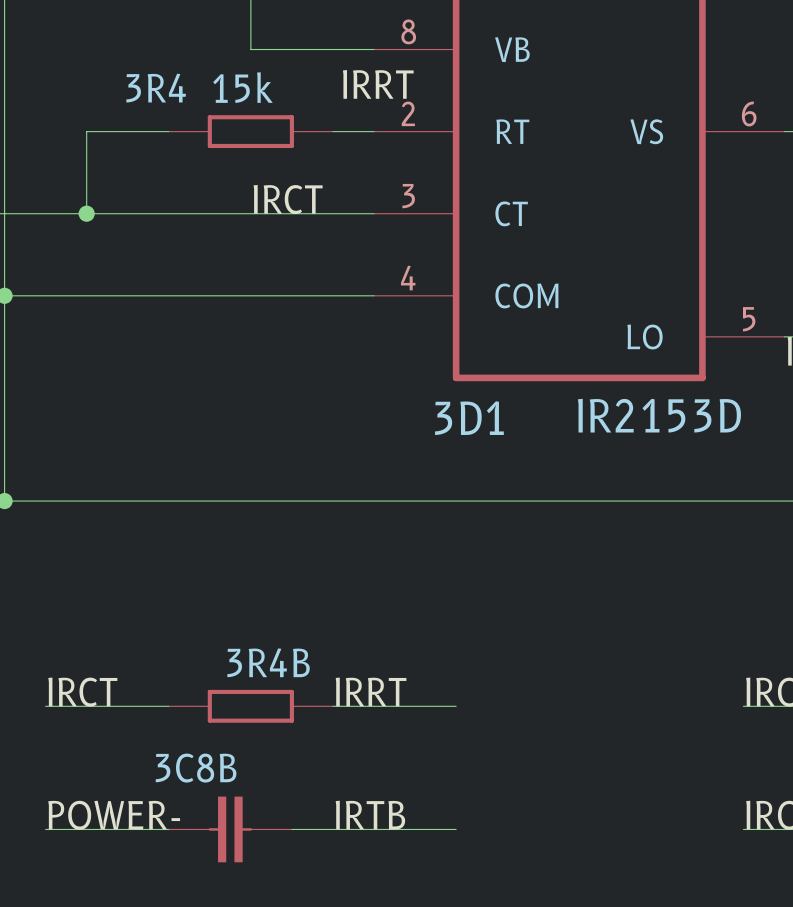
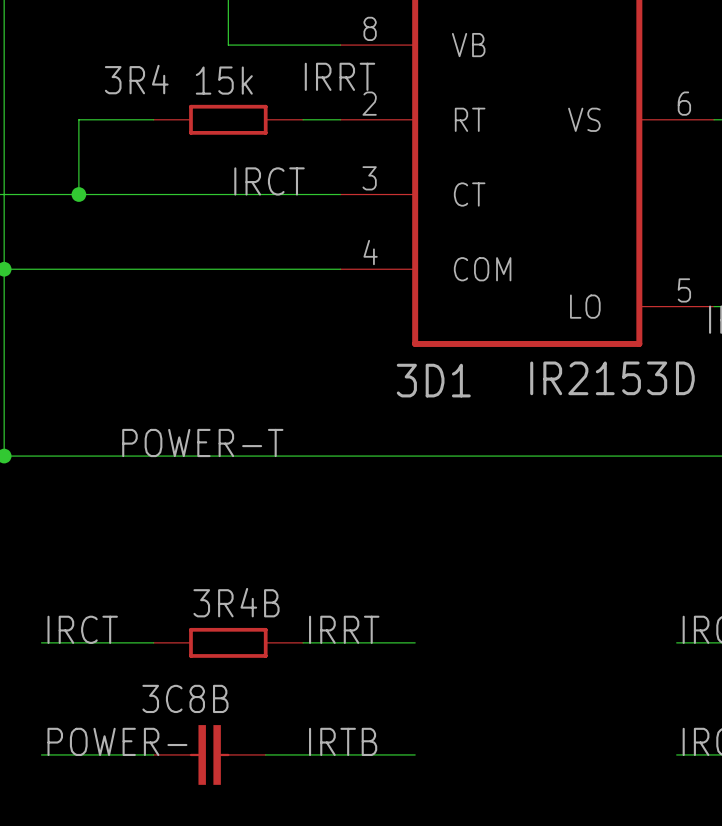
label: none -> POWER-T (202, 442)

